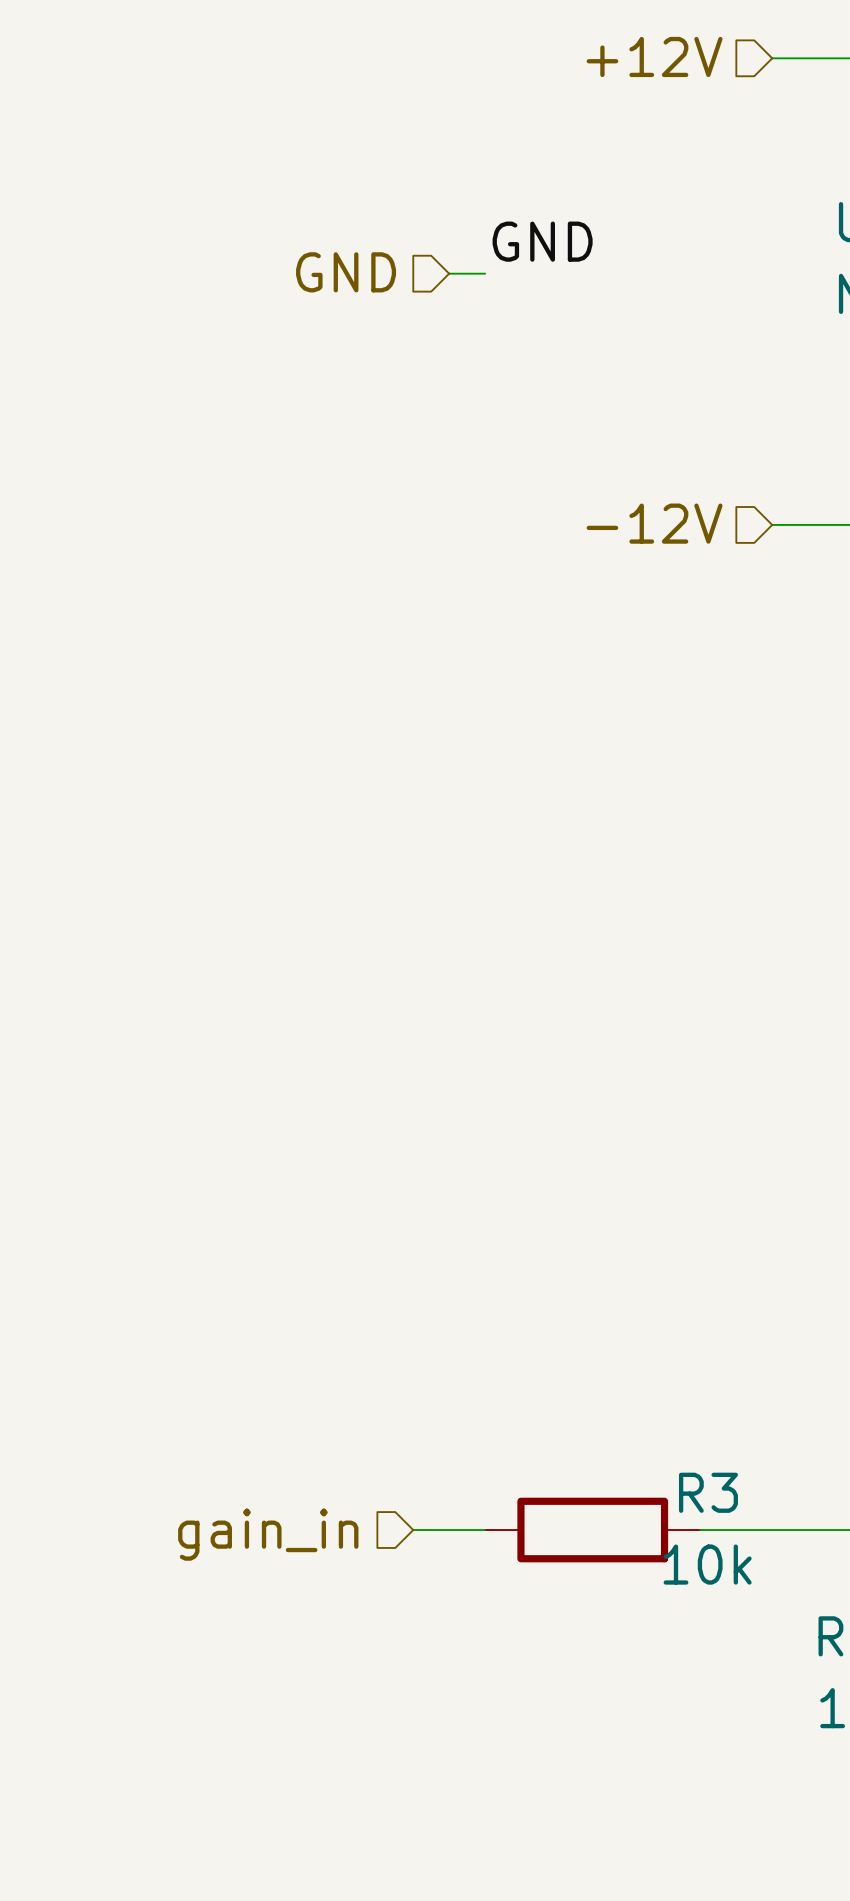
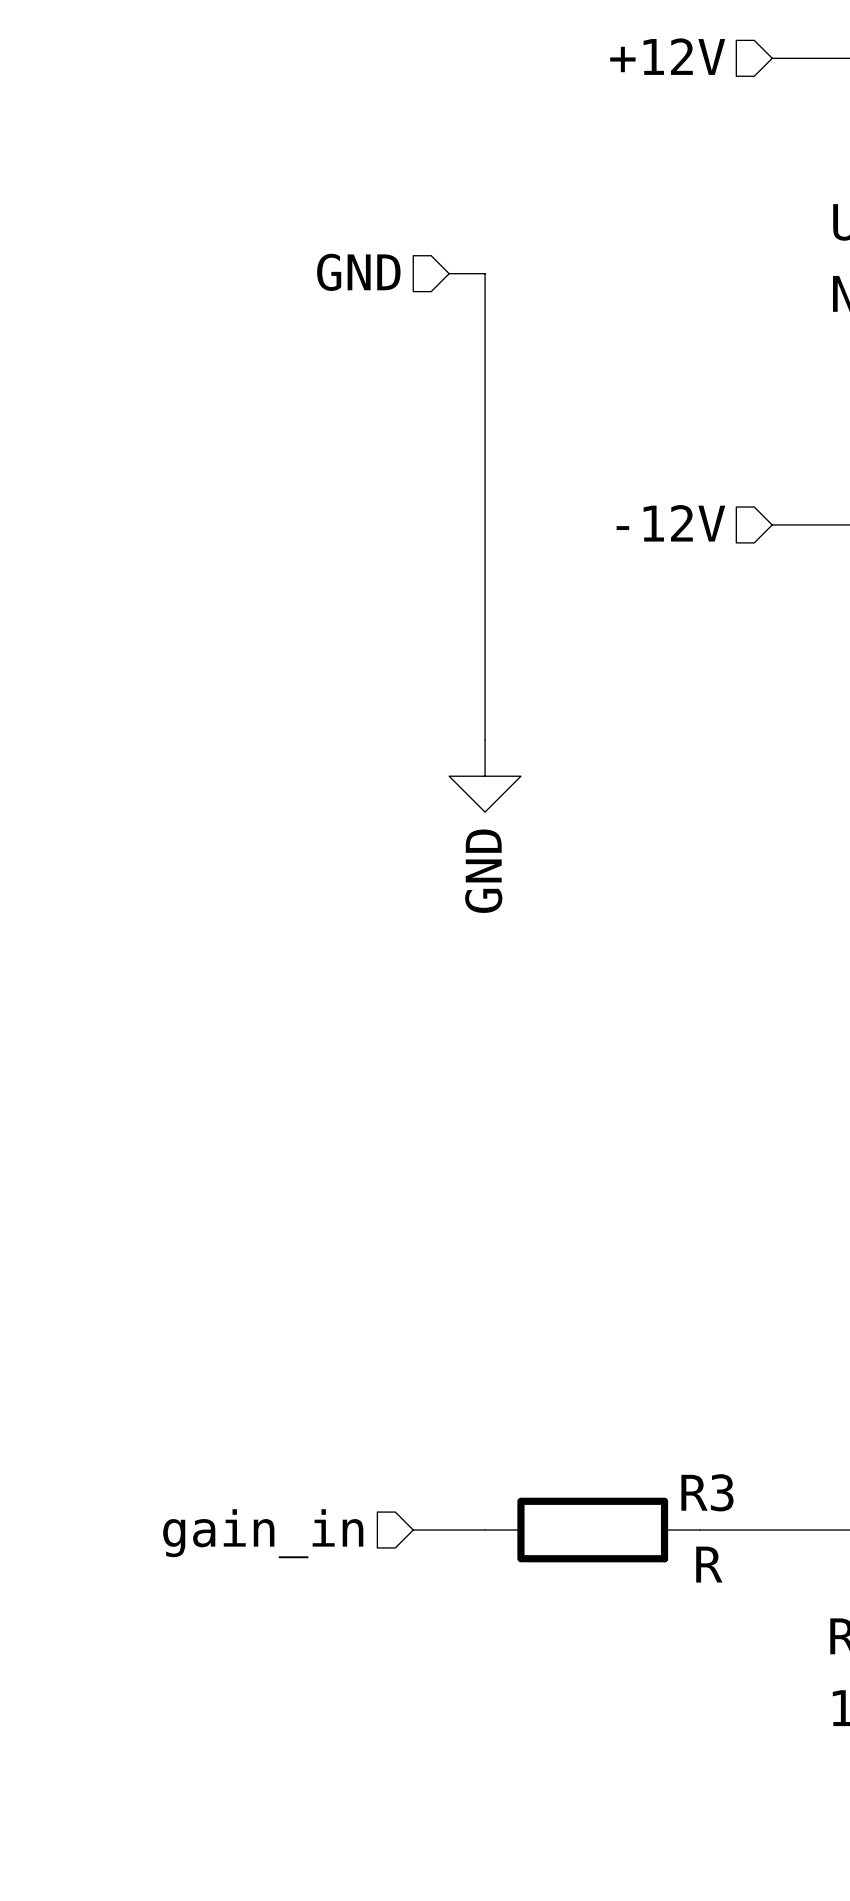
label: GND (542, 241) -> none
wire: none -> (485, 273) (485, 740)
power symbol: none -> GND (485, 776)
R3 value: 10k (707, 1564) -> R (709, 1564)

